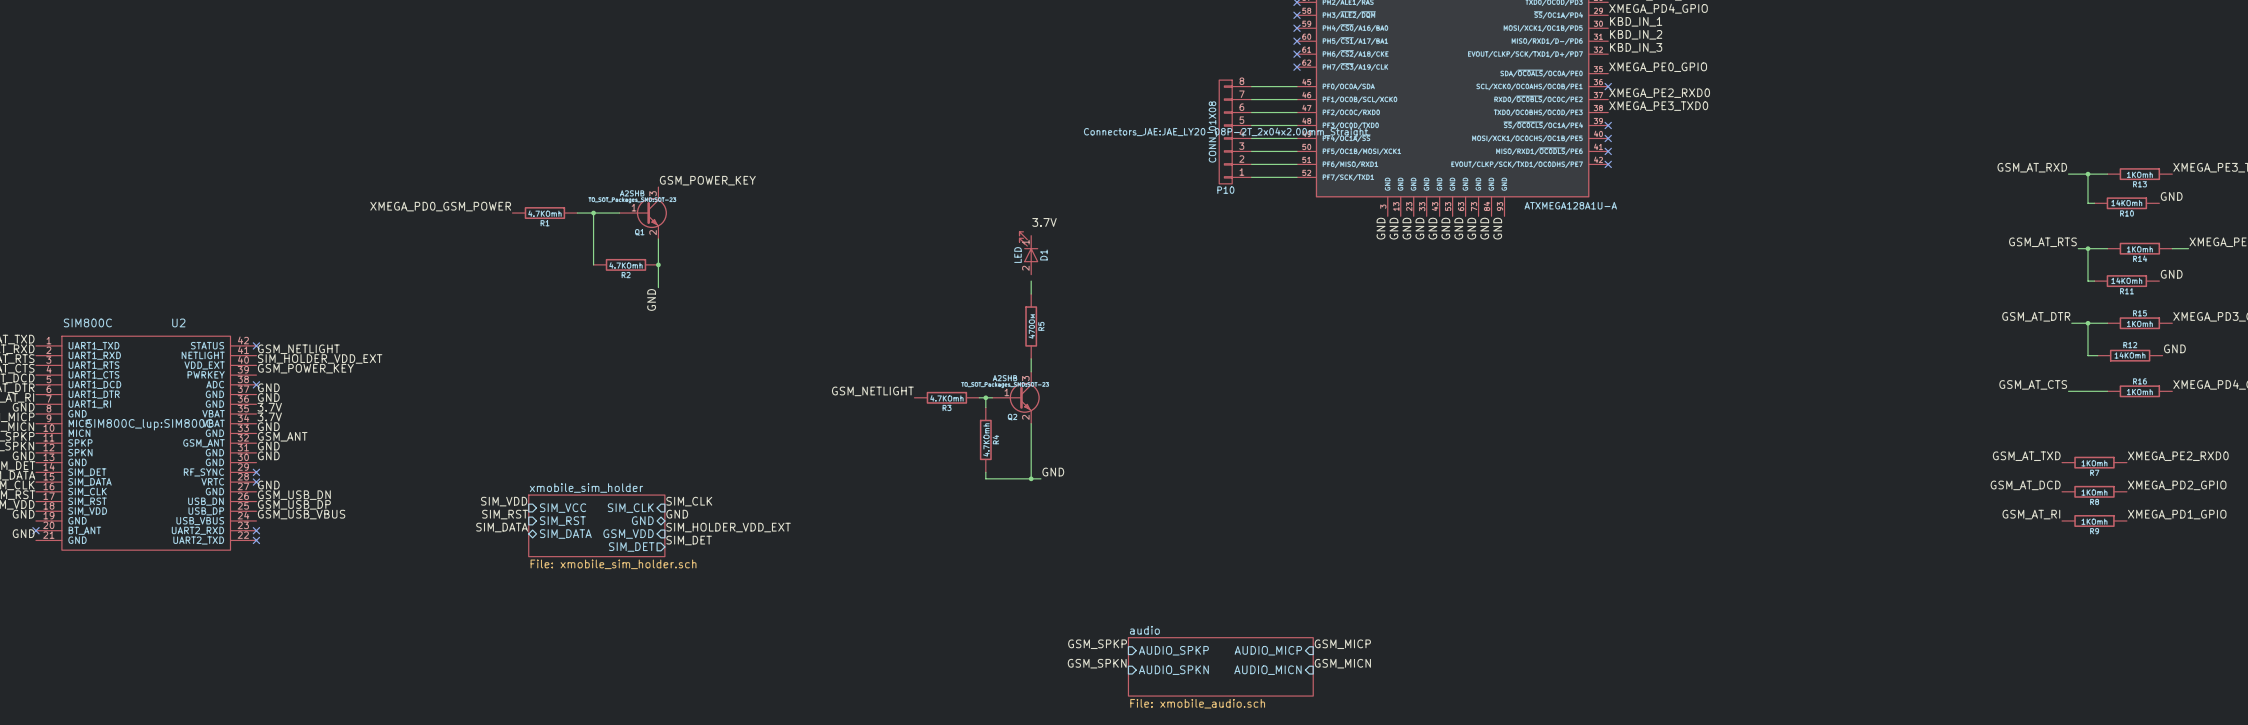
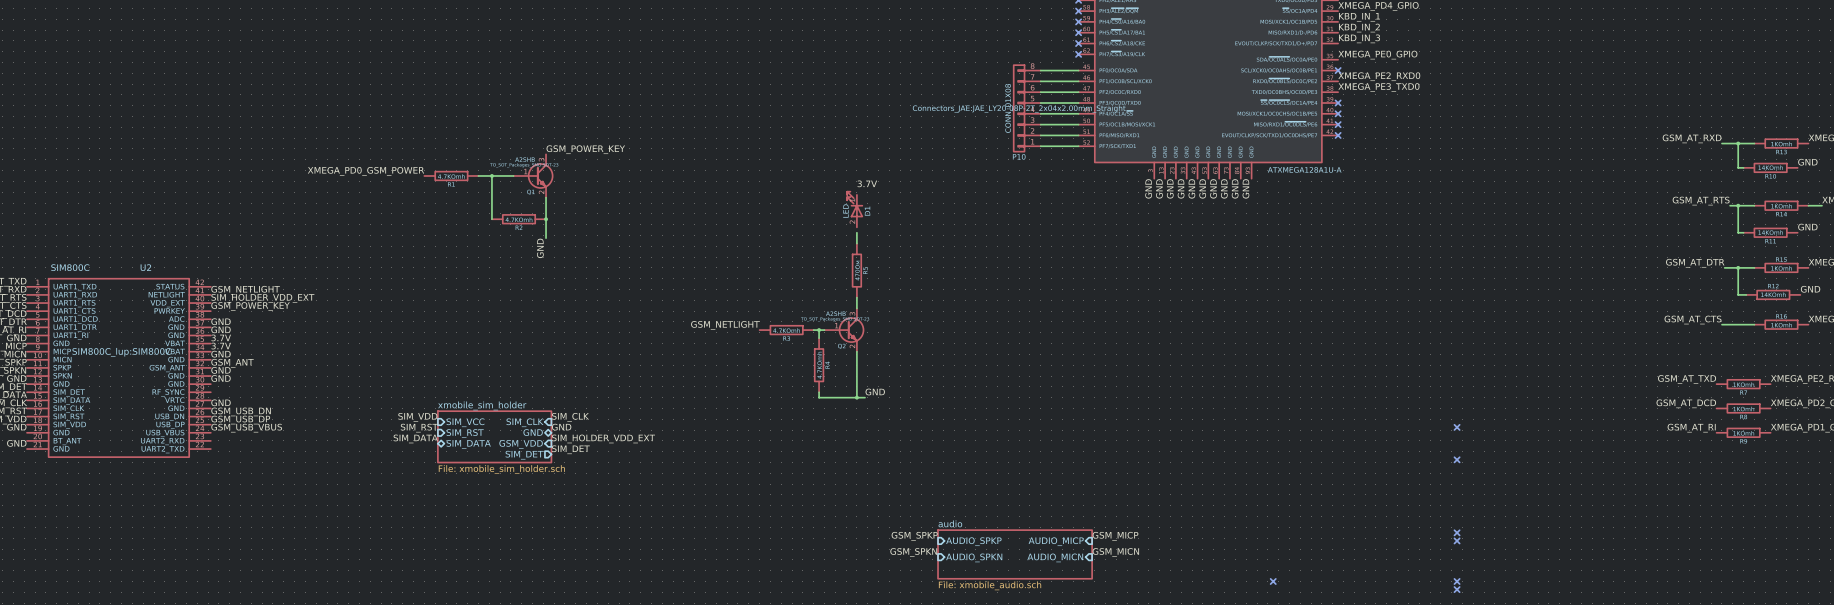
no-connect mark: (256, 345) -> none
no-connect mark: (256, 384) -> none
no-connect mark: (256, 472) -> none
no-connect mark: (256, 482) -> none
no-connect mark: none -> (1457, 427)
no-connect mark: (35, 530) -> none
no-connect mark: (256, 530) -> none
no-connect mark: (256, 540) -> none
no-connect mark: none -> (1457, 459)
no-connect mark: none -> (1457, 532)
no-connect mark: none -> (1457, 540)
no-connect mark: none -> (1273, 581)
no-connect mark: none -> (1457, 581)
no-connect mark: none -> (1457, 589)

